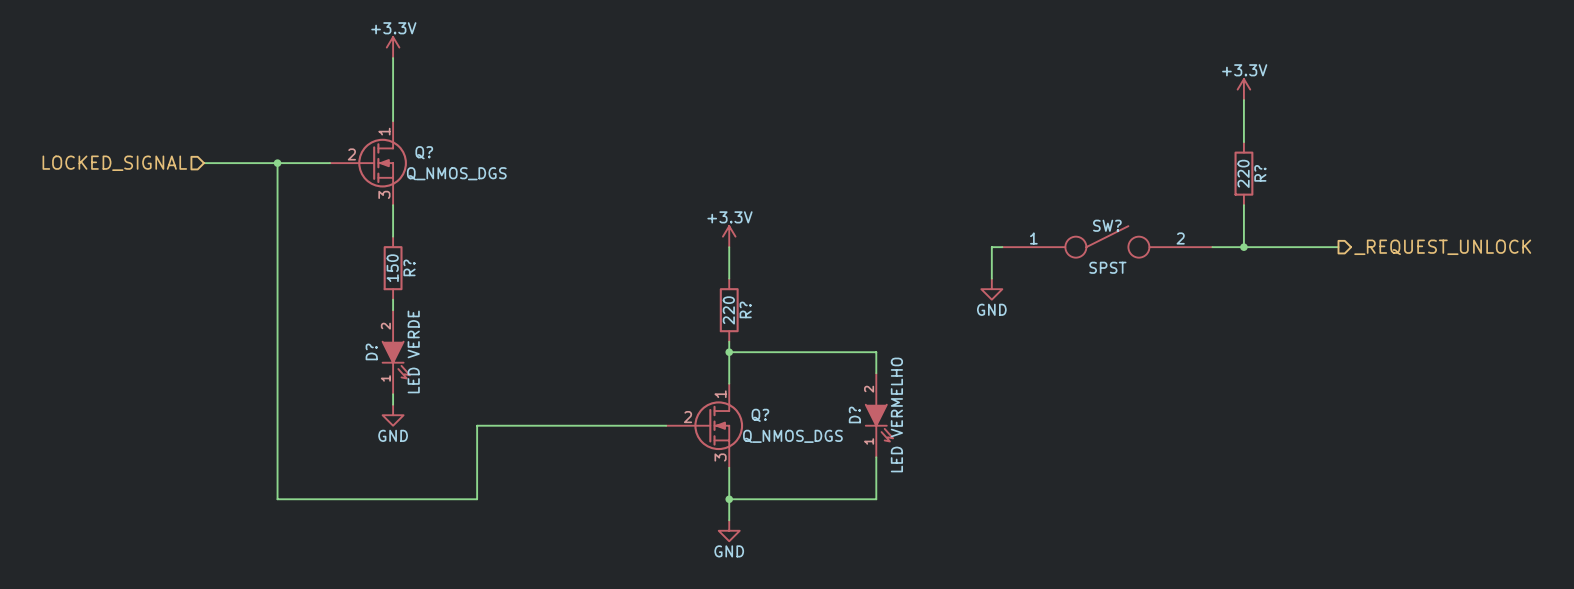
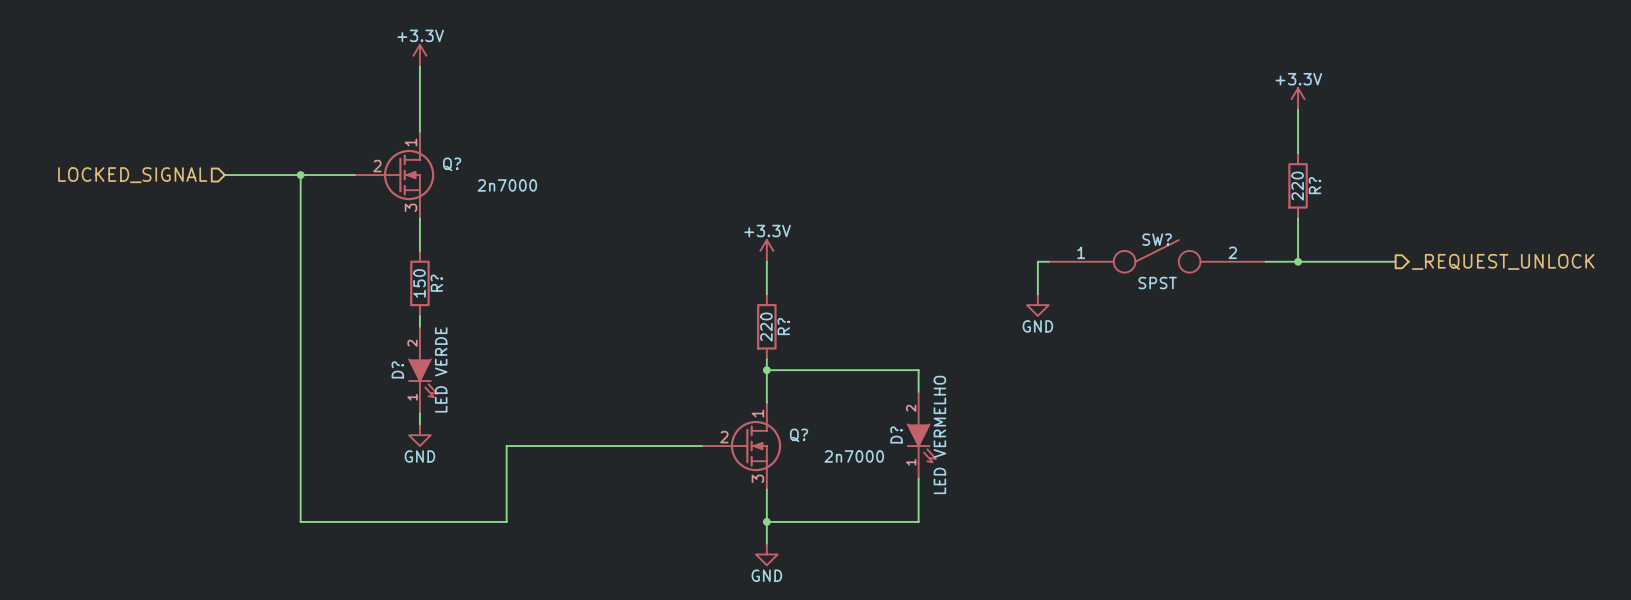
Q? value: Q_NMOS_DGS (456, 173) -> 2n7000 (507, 185)
Q? value: Q_NMOS_DGS (792, 436) -> 2n7000 (854, 456)

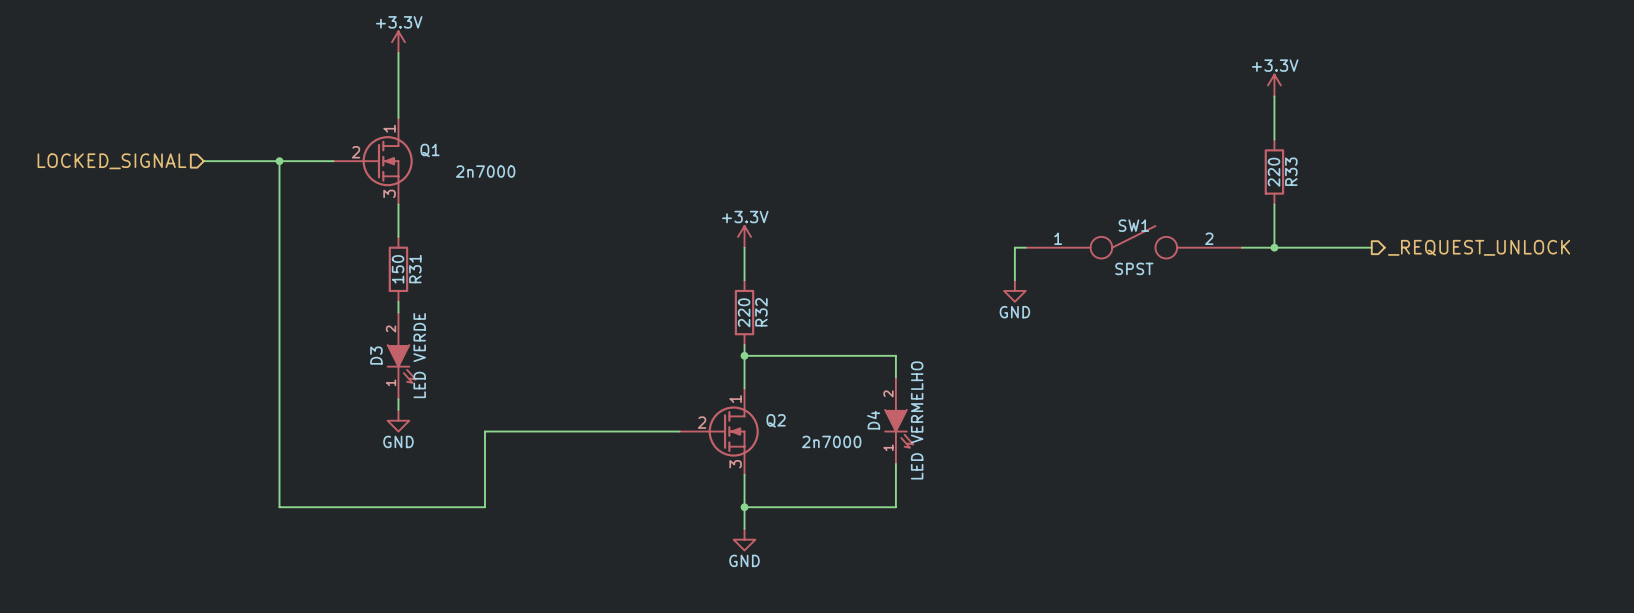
Q? name: Q? (452, 164) -> Q1 (430, 150)
R? name: R? (1315, 185) -> R33 (1291, 171)
SW? name: SW? (1157, 239) -> SW1 (1133, 225)
R? name: R? (436, 283) -> R31 (415, 269)
R? name: R? (783, 326) -> R32 (761, 312)
D? name: D? (397, 369) -> D3 (376, 355)
D? name: D? (896, 434) -> D4 (873, 420)
Q? name: Q? (799, 435) -> Q2 (776, 420)

